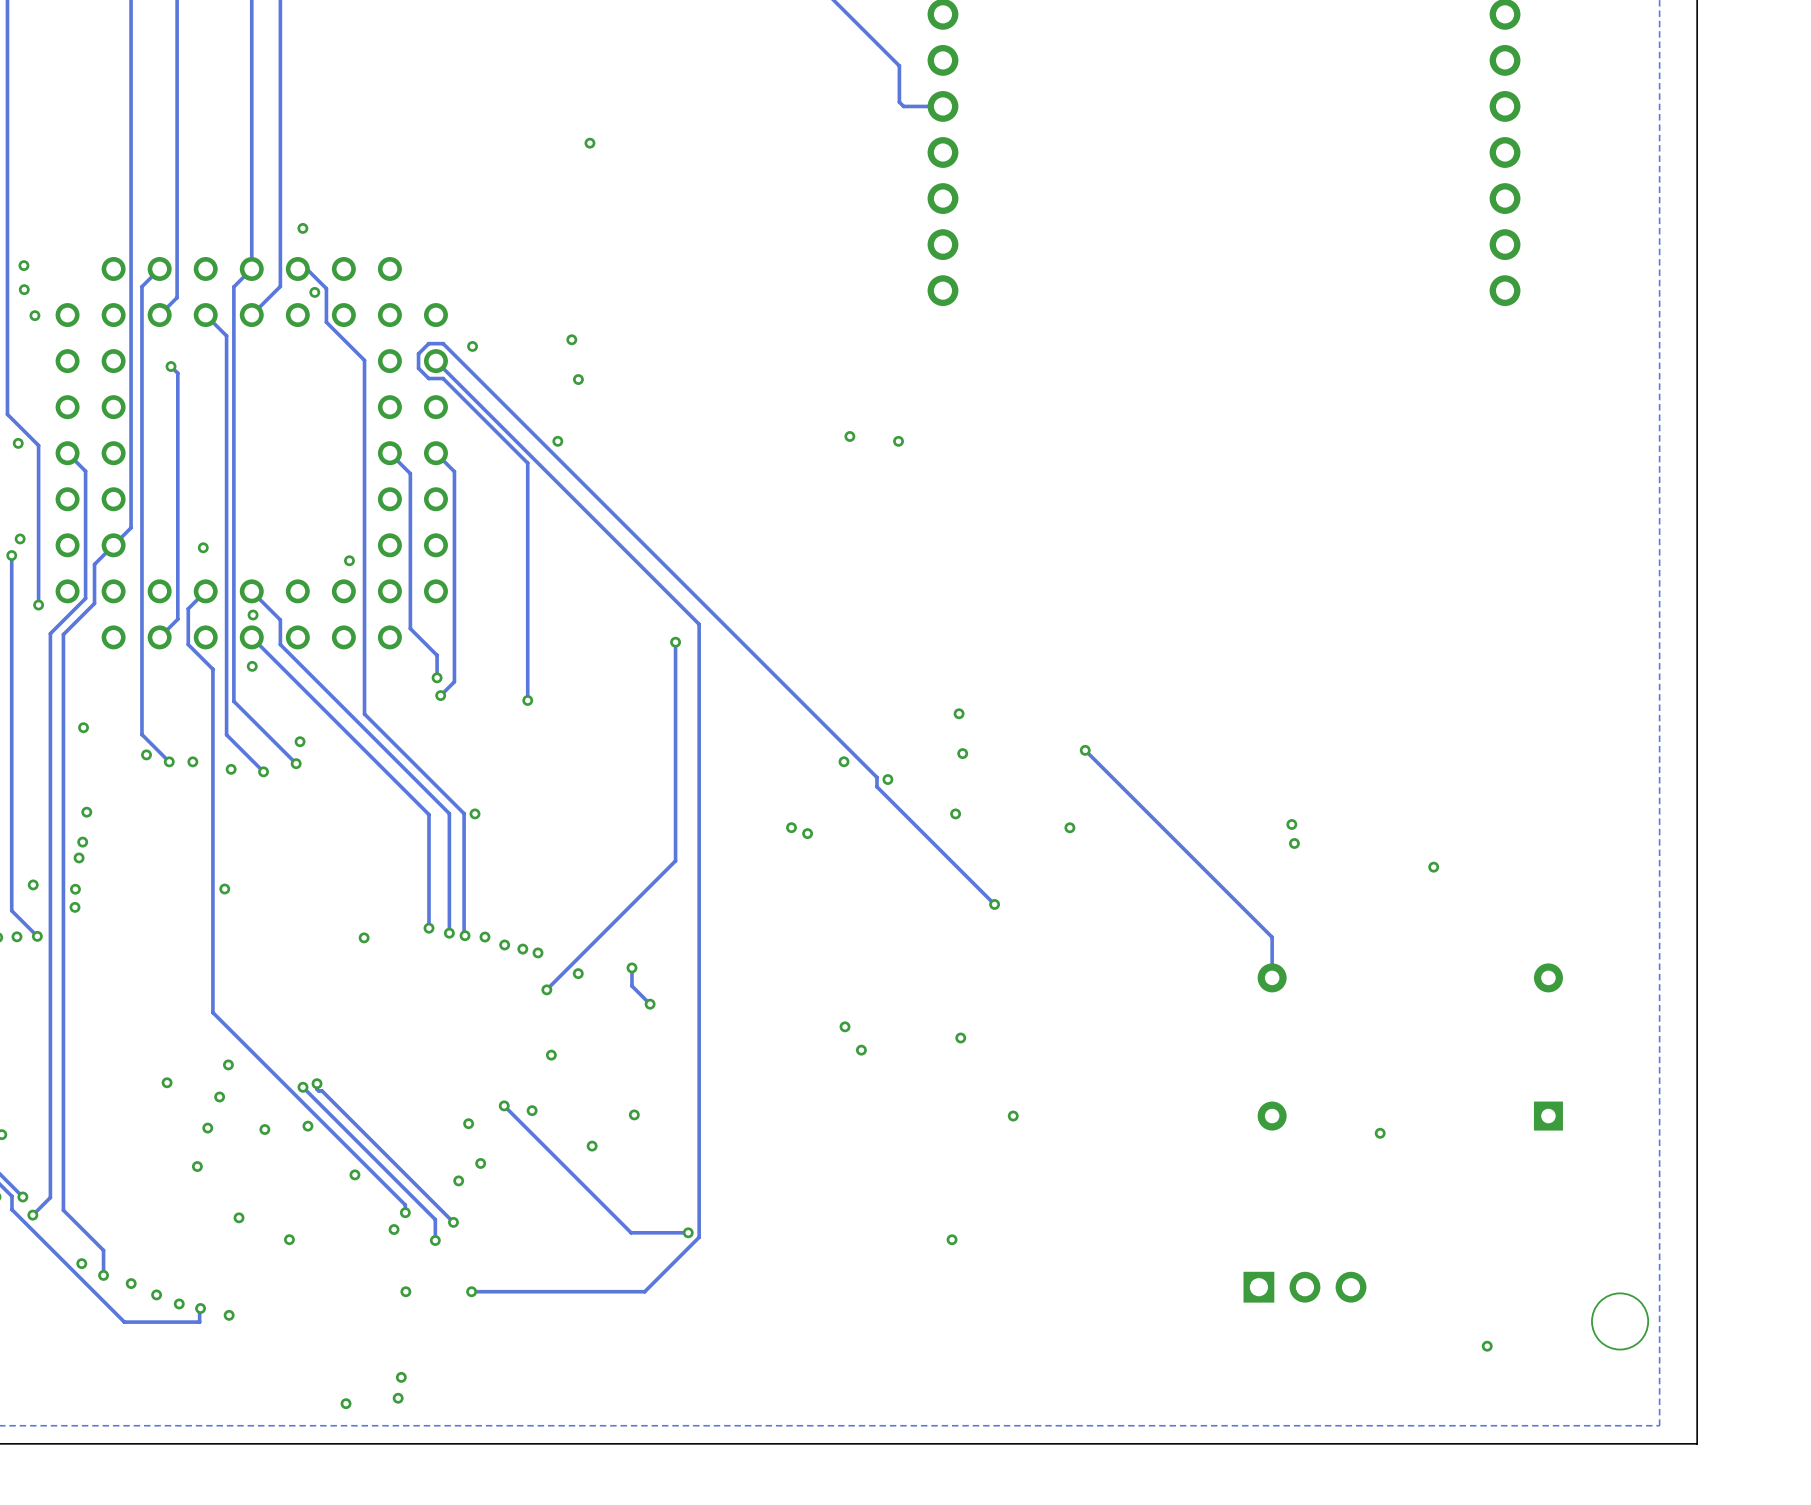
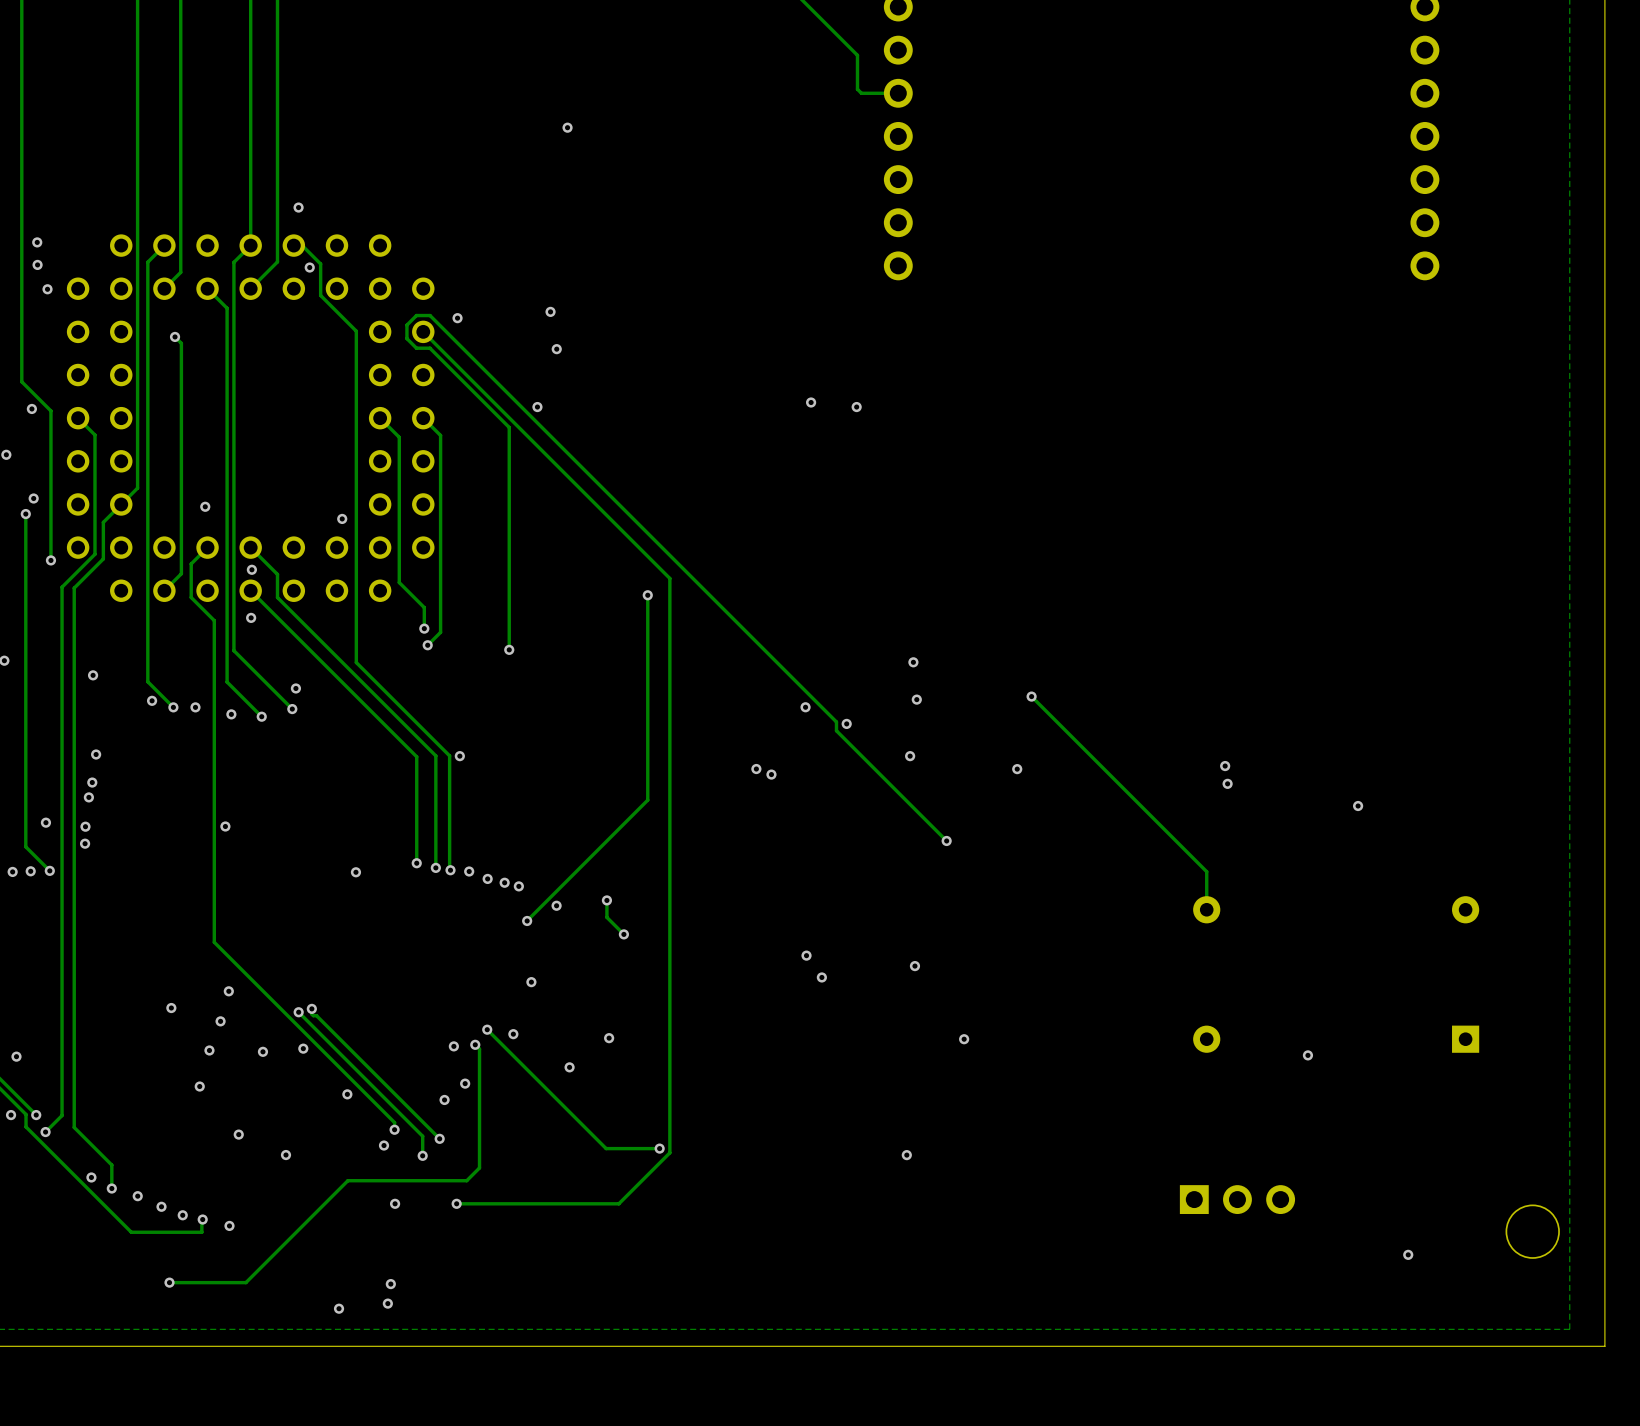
track: none -> (475, 1044) (479, 1049) (479, 1167) (466, 1180) (347, 1180) (245, 1282) (169, 1282)
via: none -> (475, 1044)
via: none -> (169, 1282)

